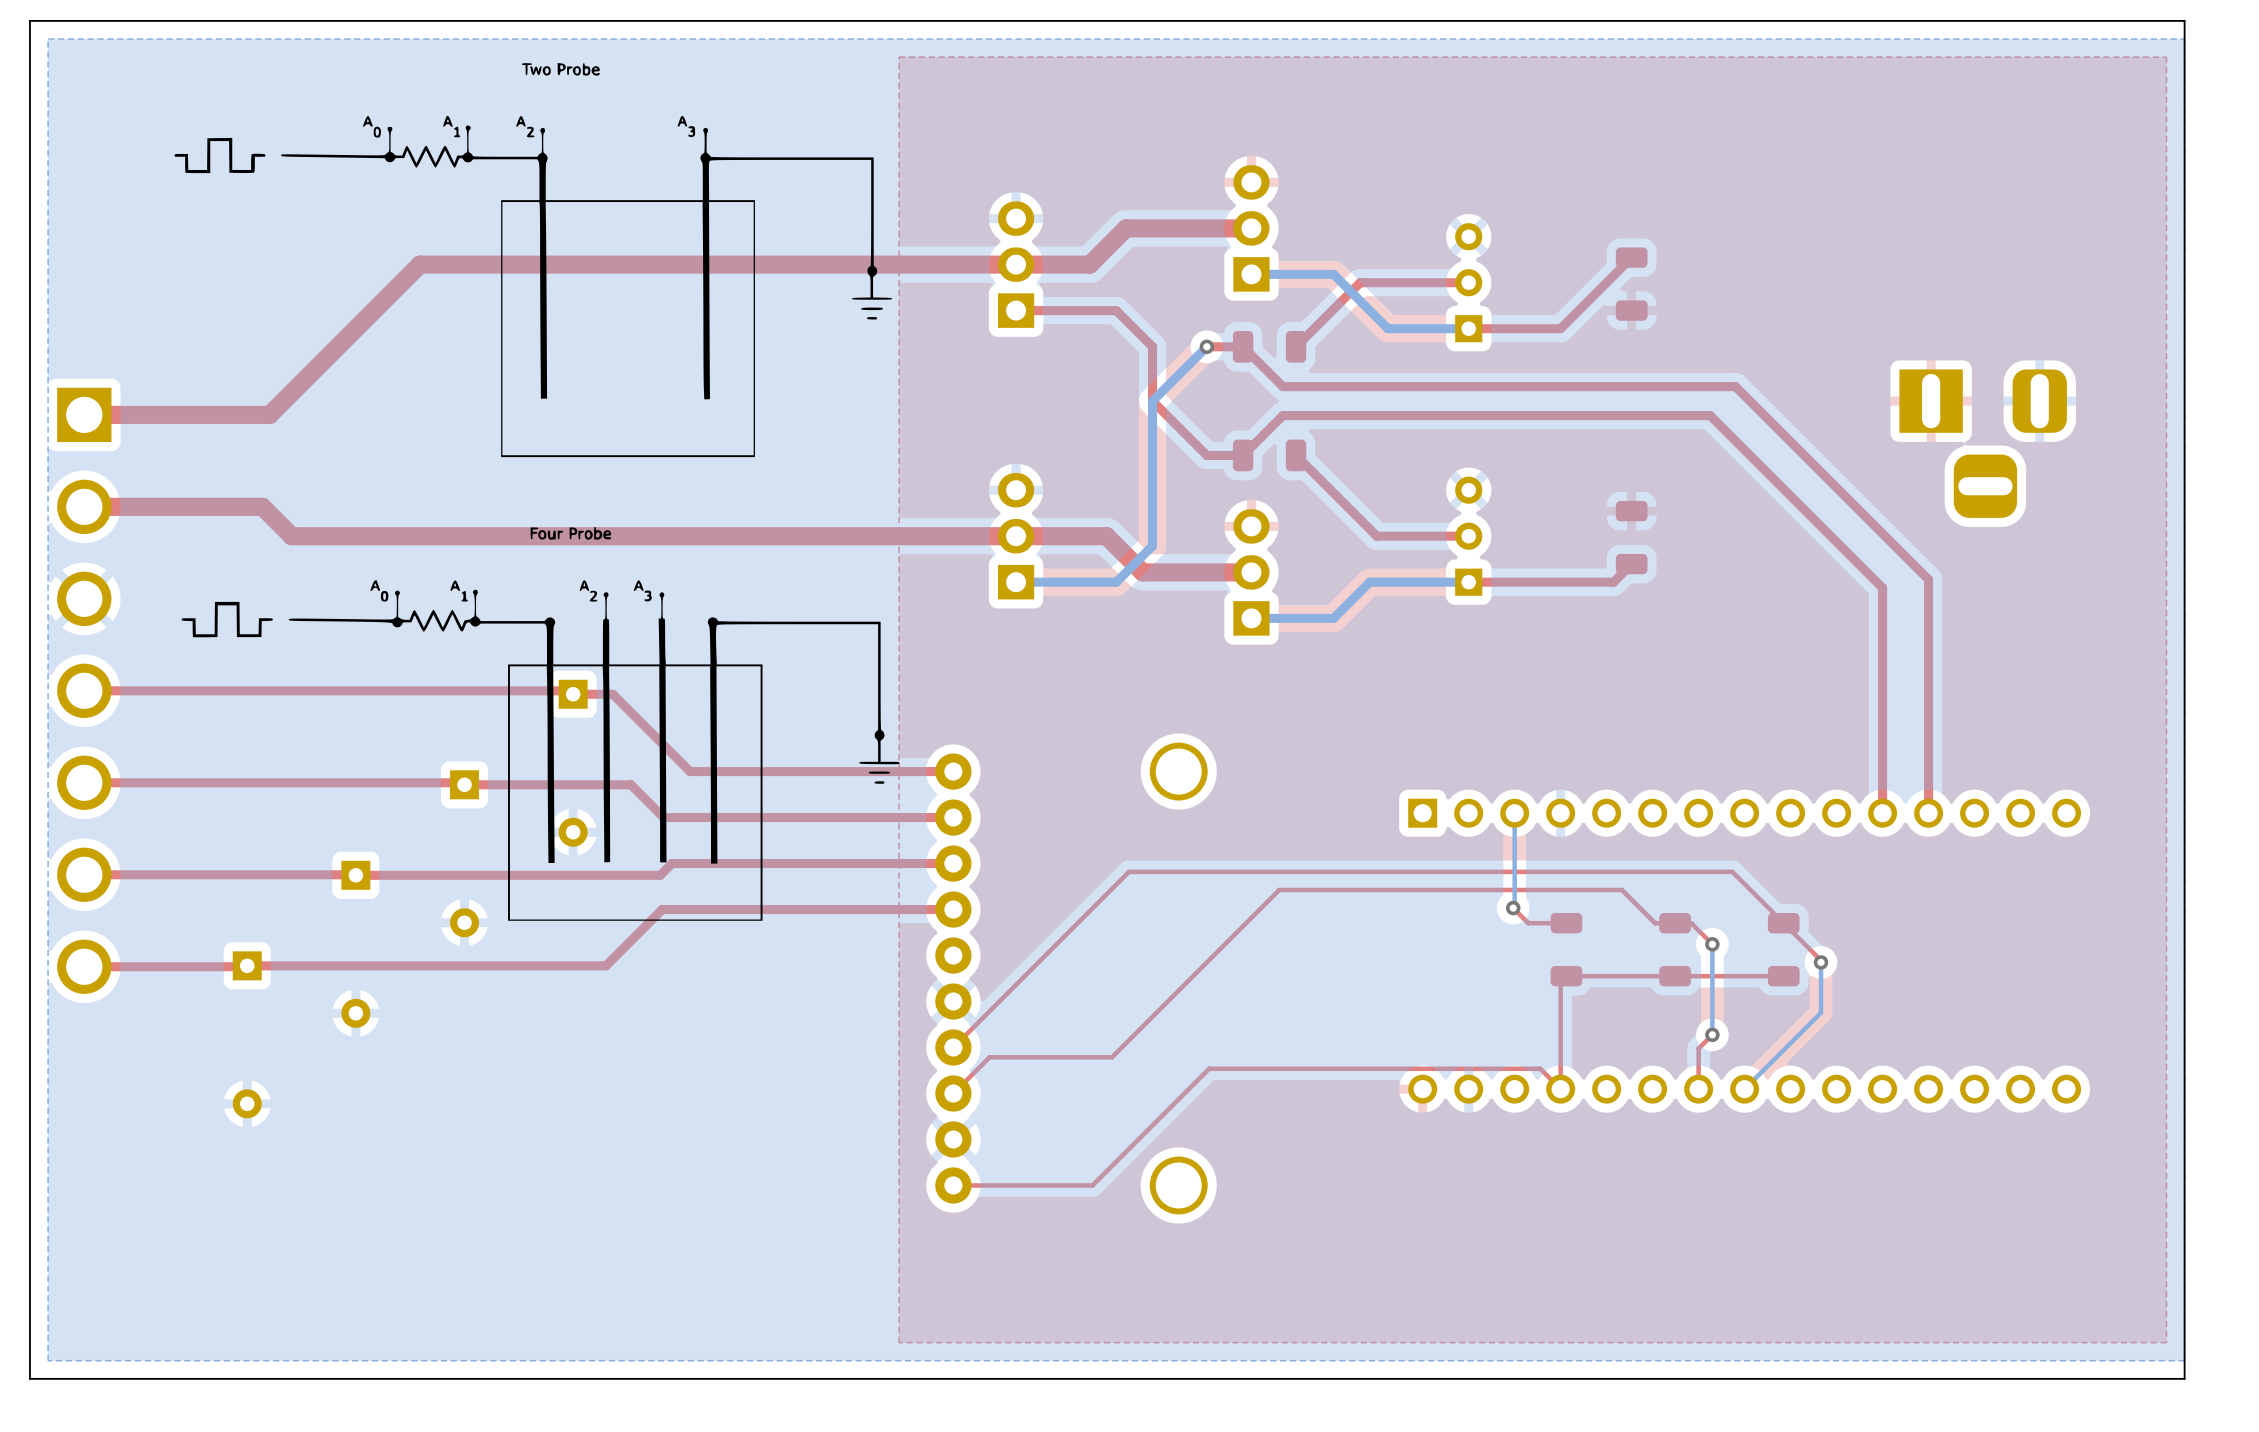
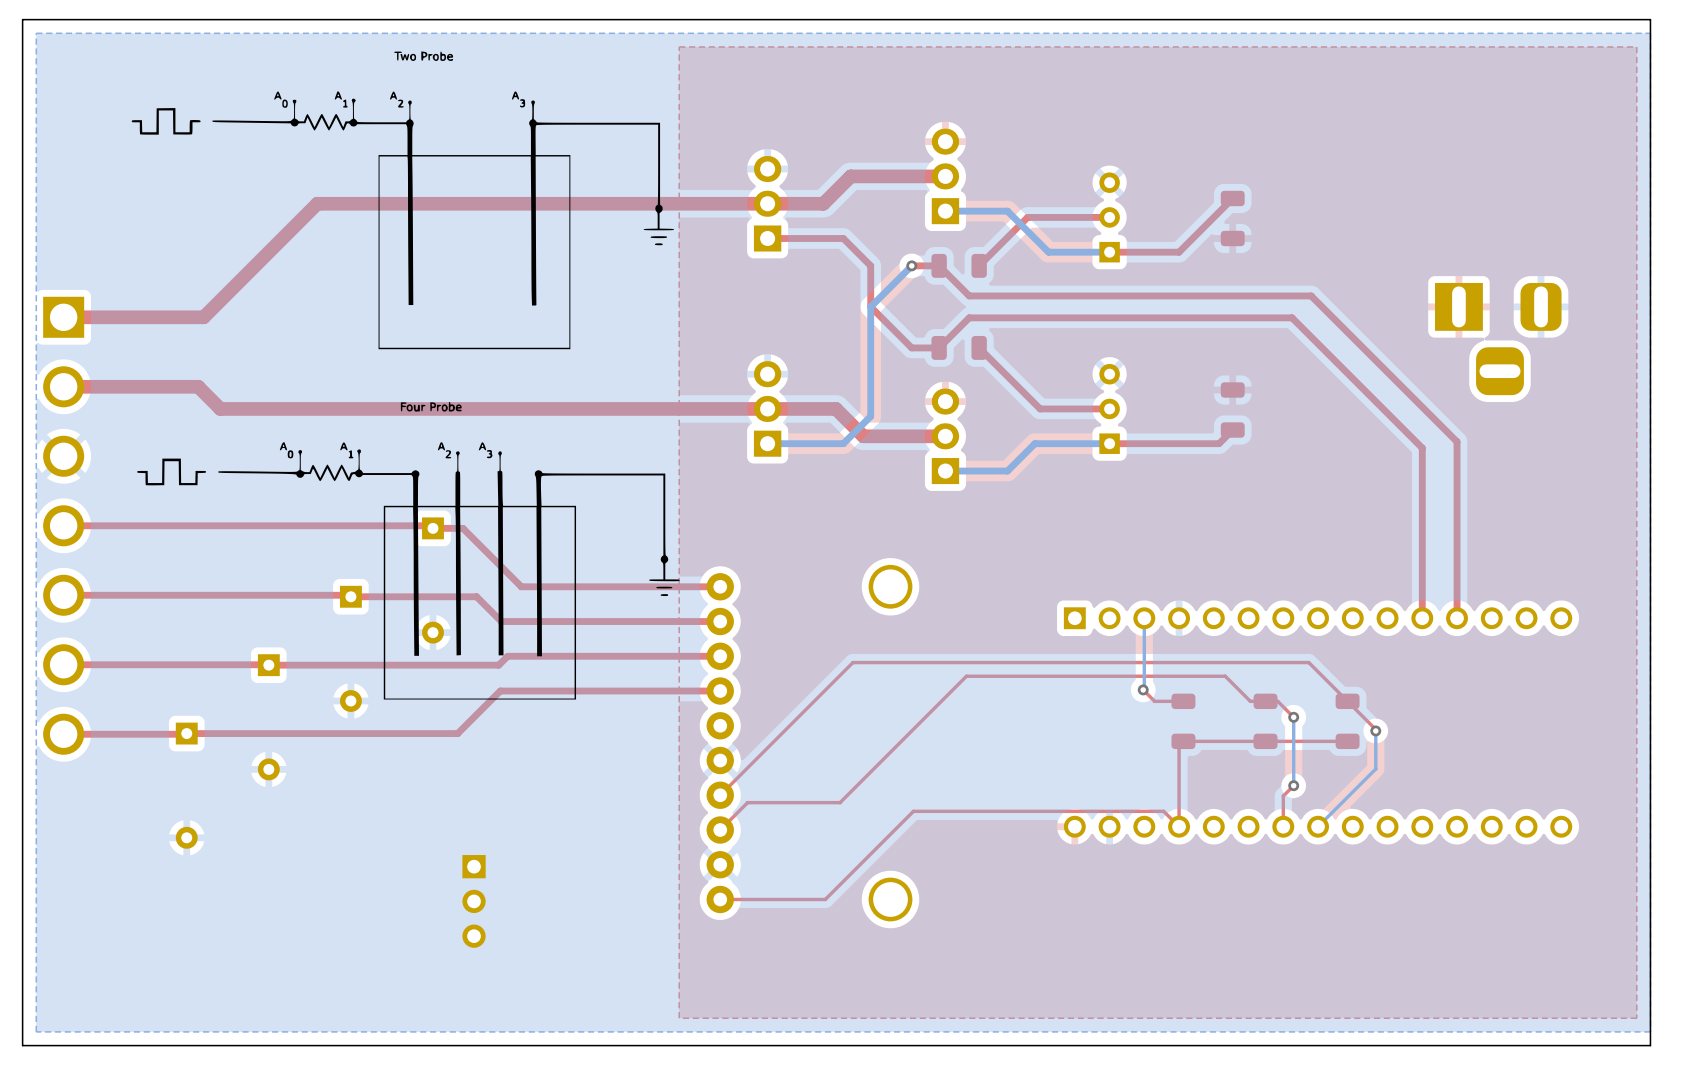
part: none -> (474, 901)

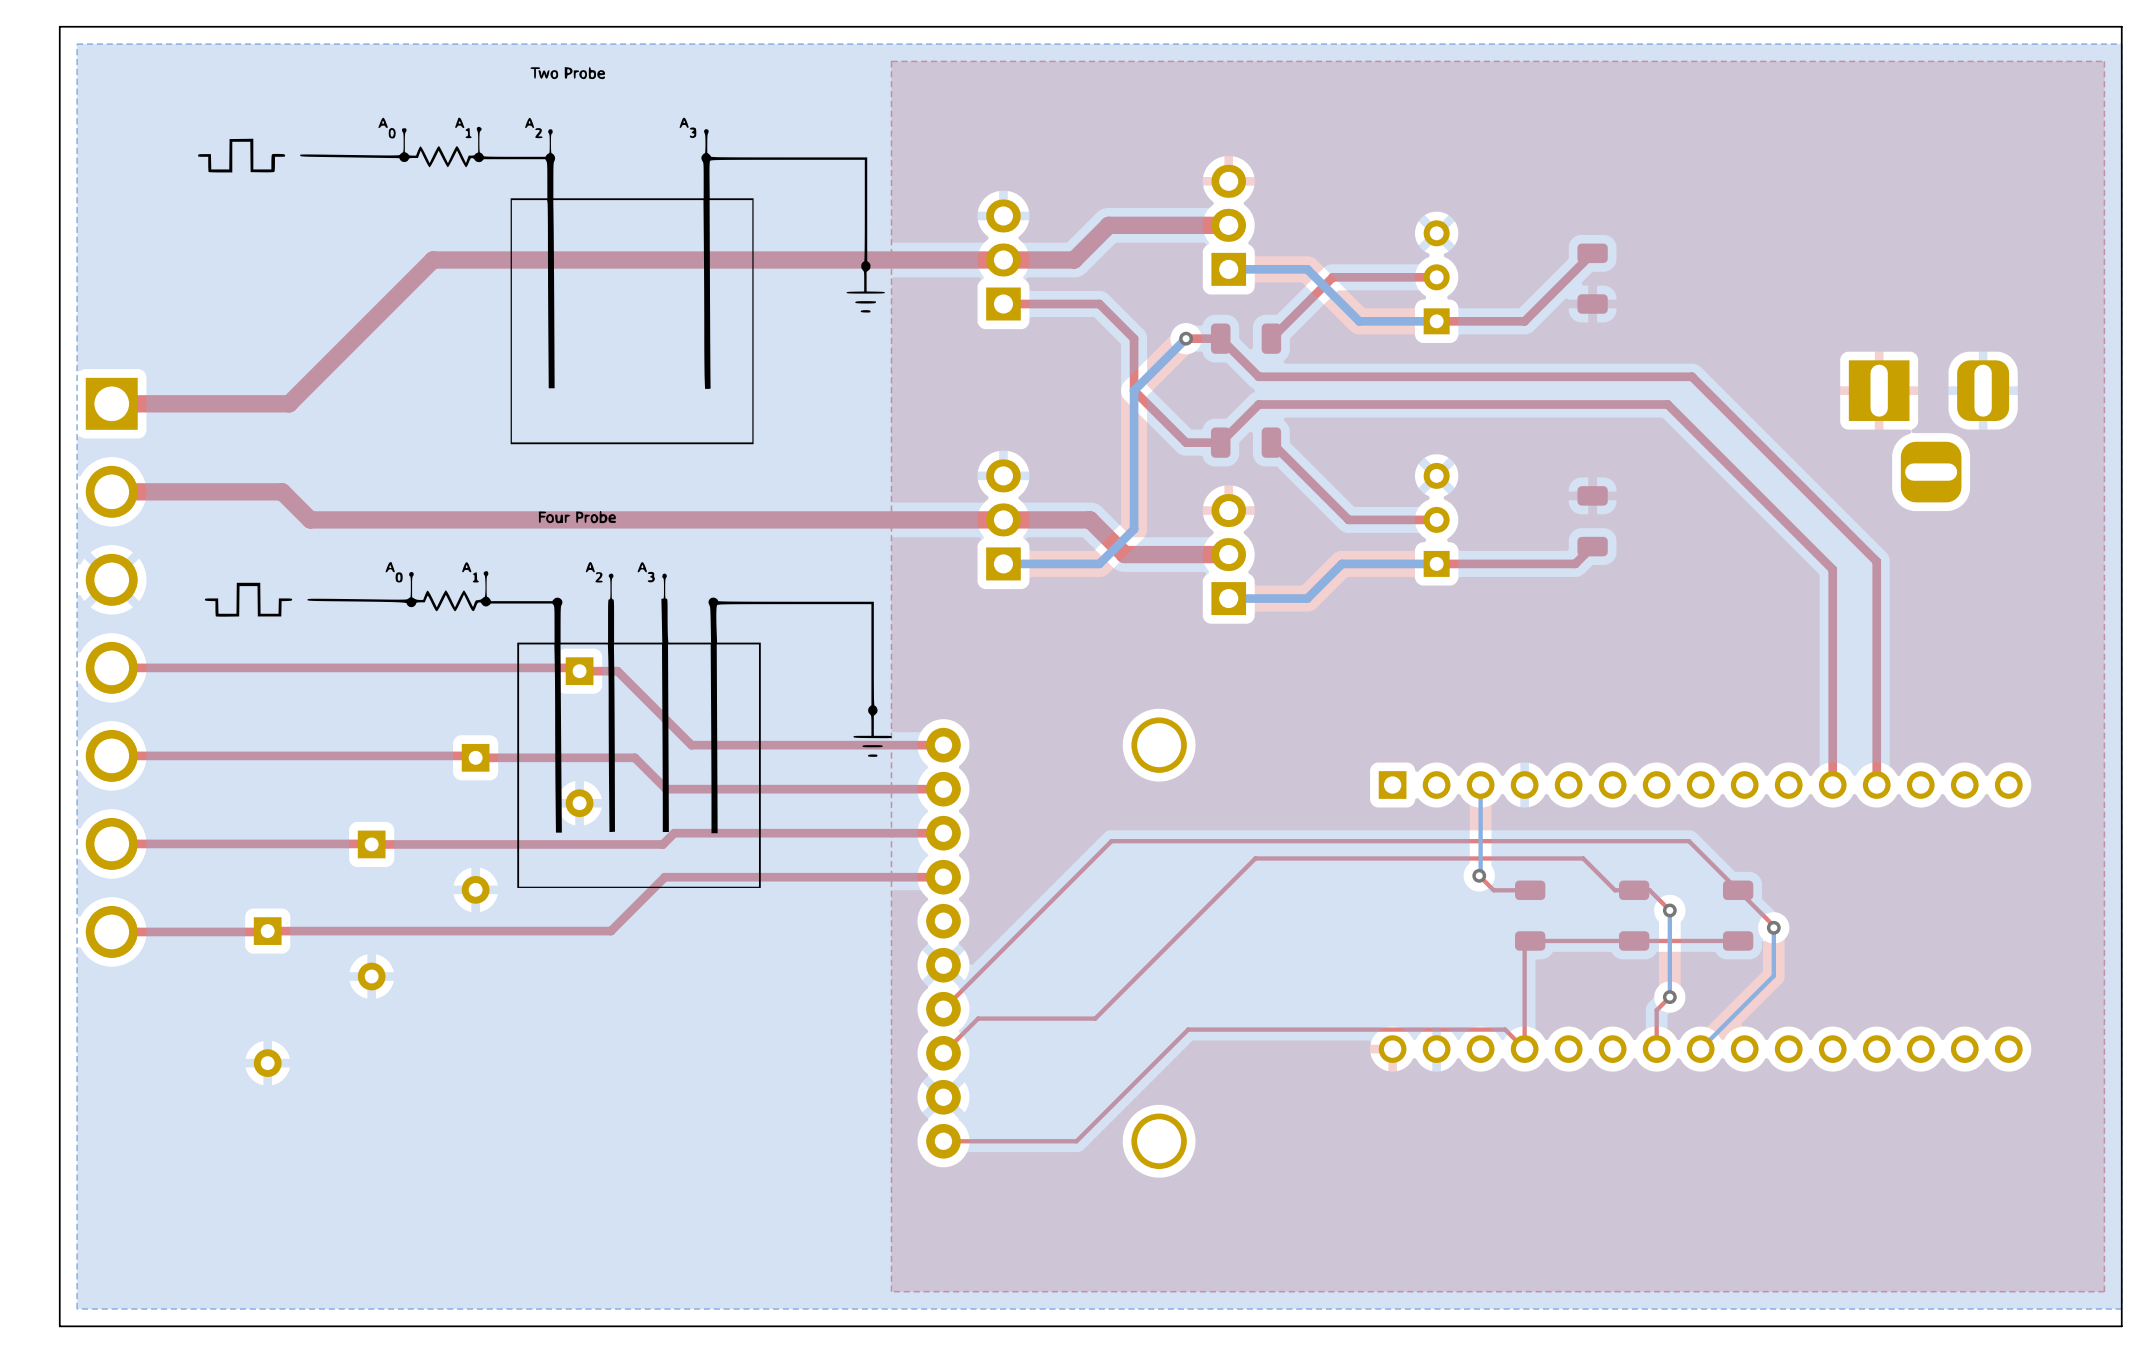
part: (474, 901) -> none

